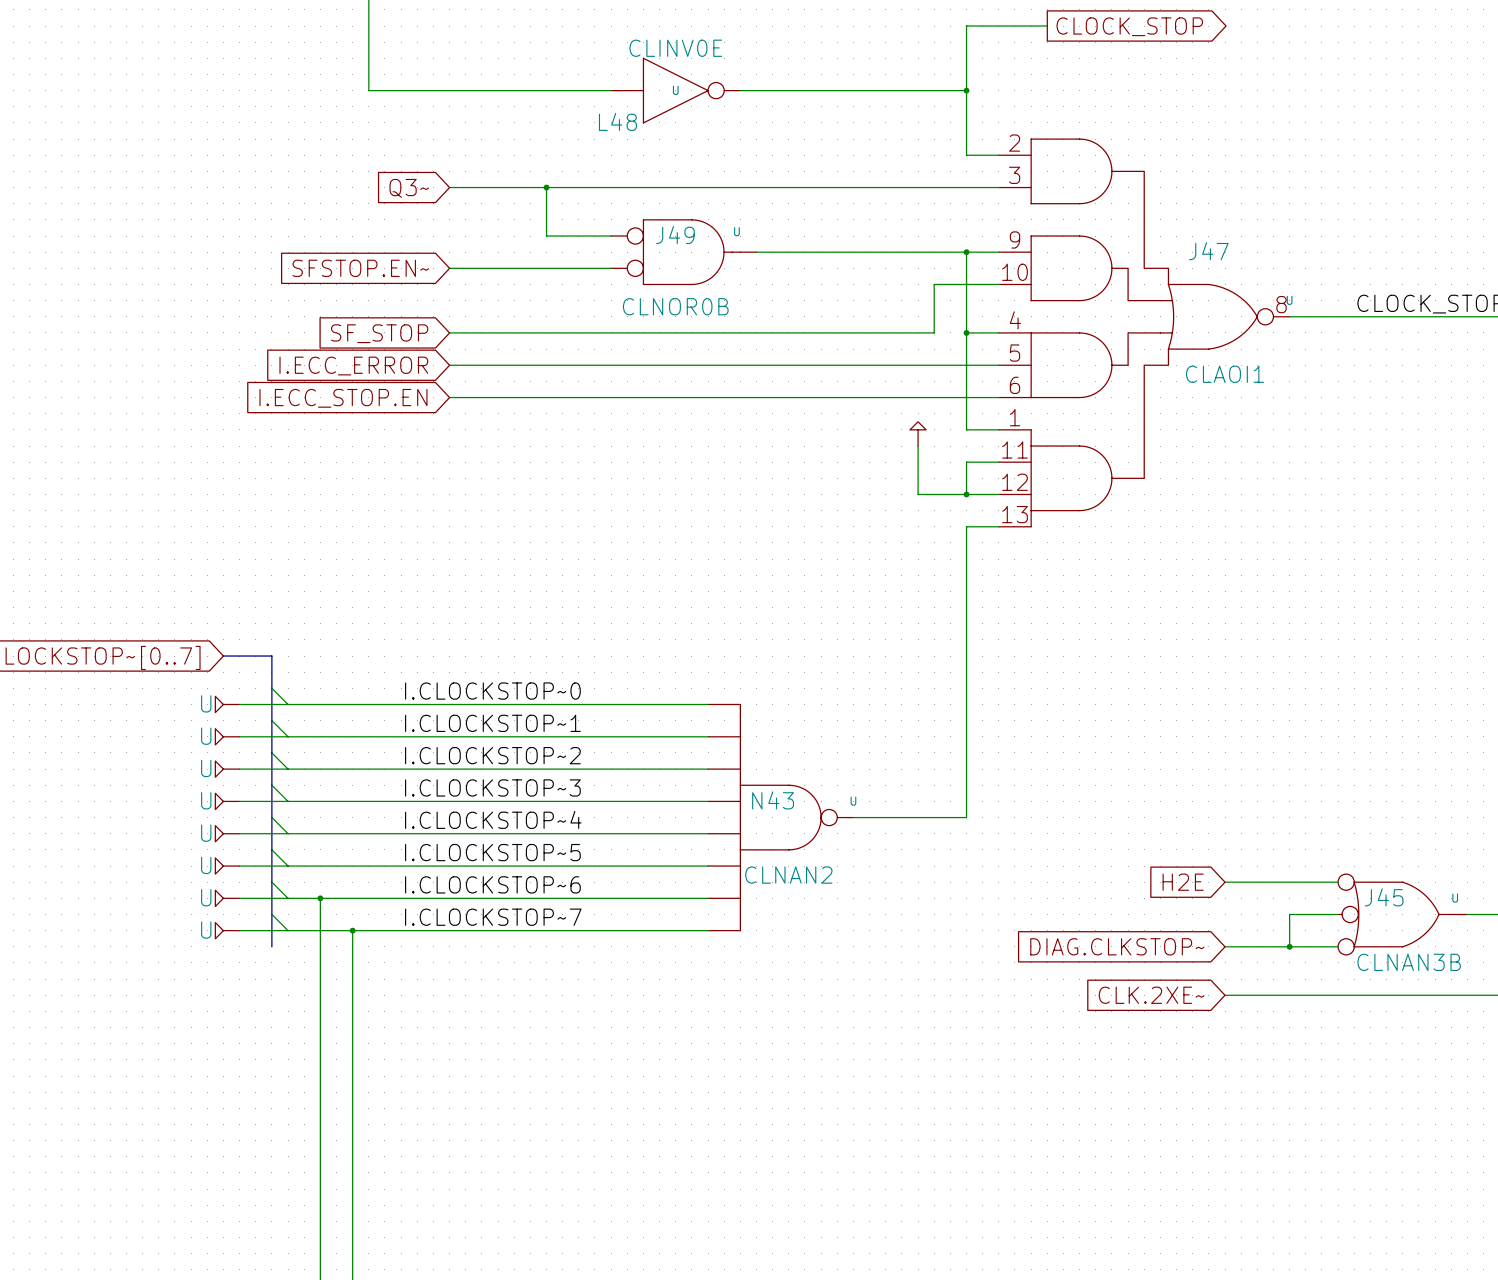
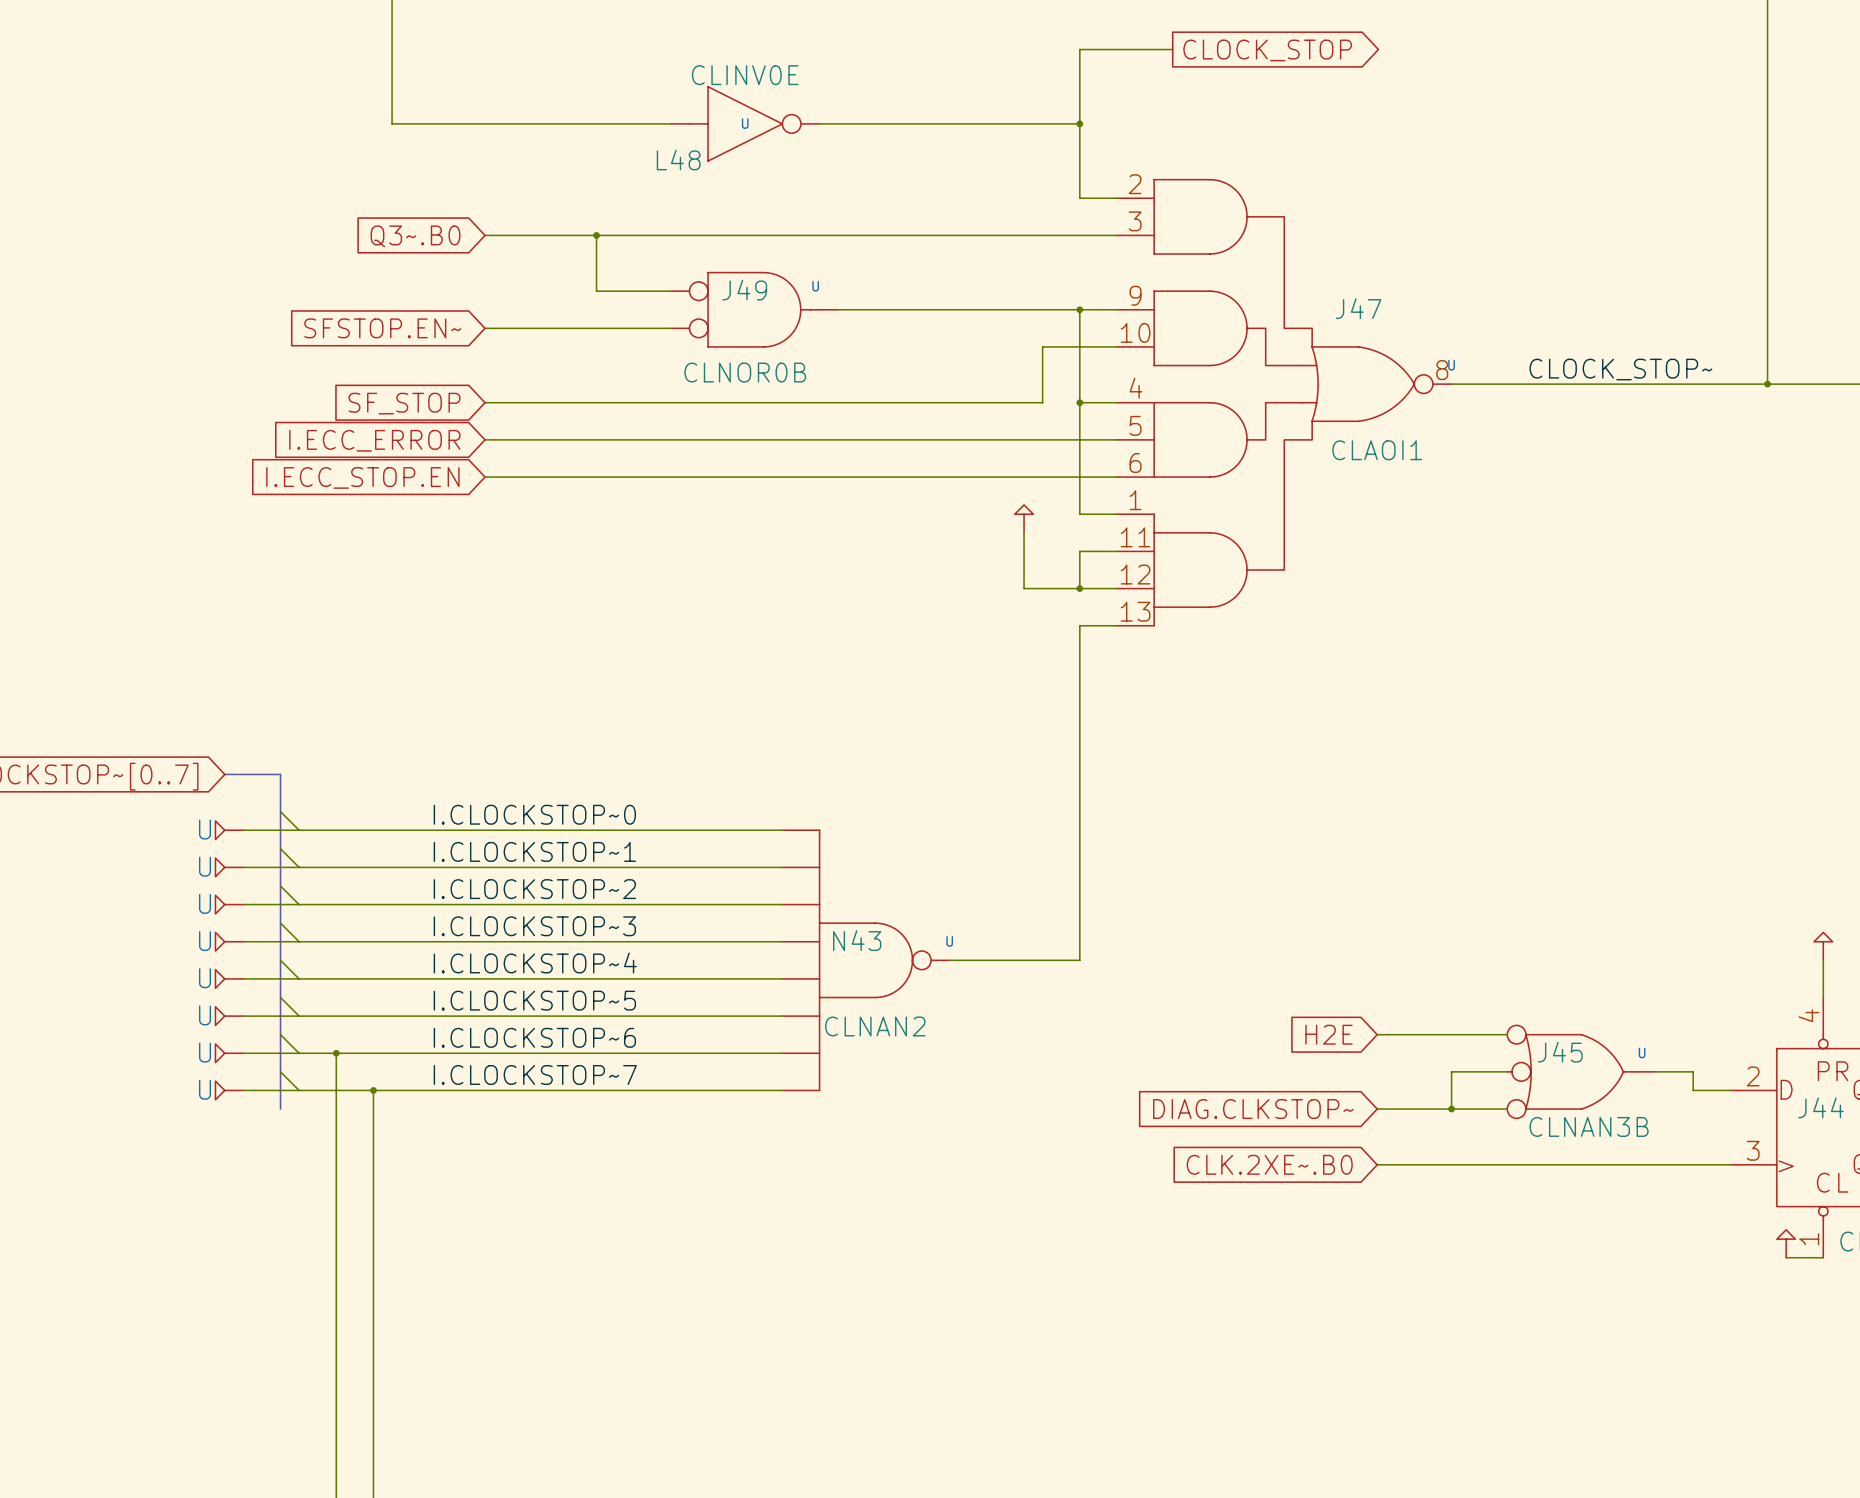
global label: Q3~ (409, 188) -> Q3~.B0 (415, 236)
global label: CLK.2XE~ (1151, 995) -> CLK.2XE~.B0 (1269, 1164)

